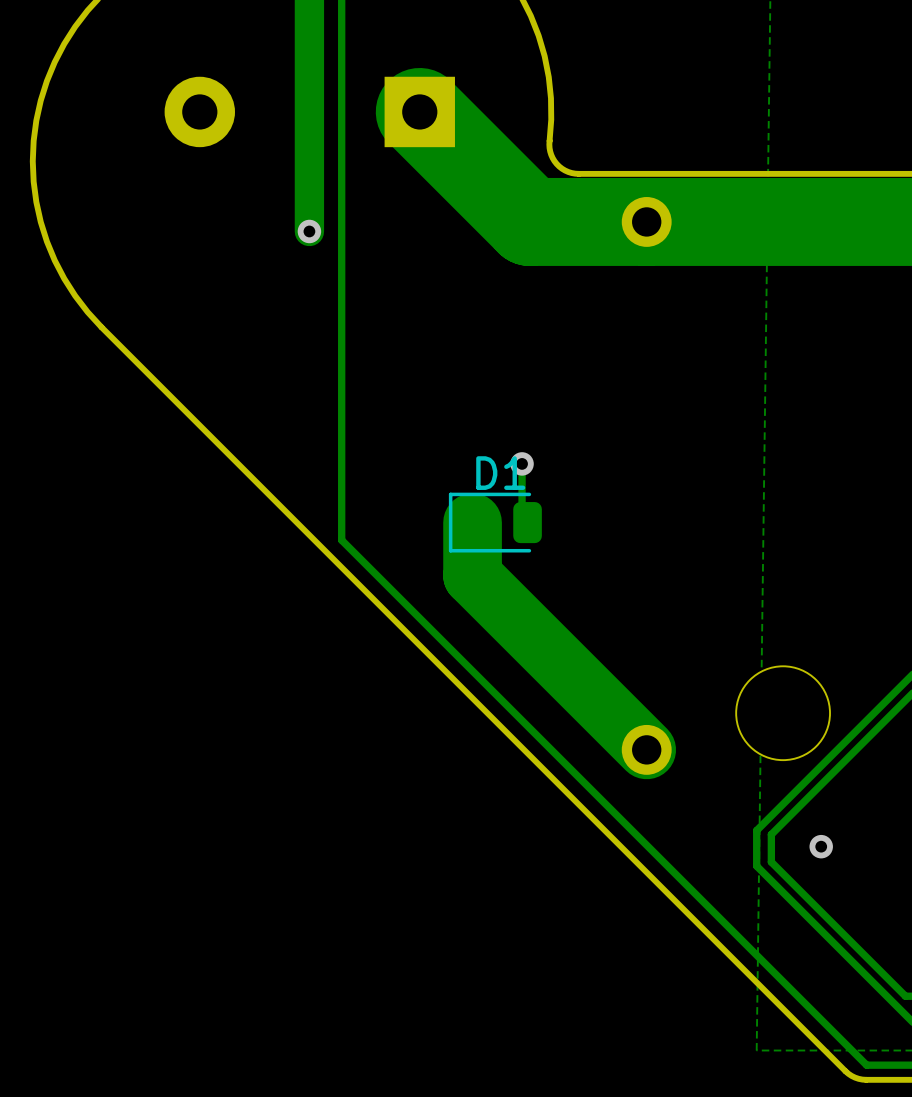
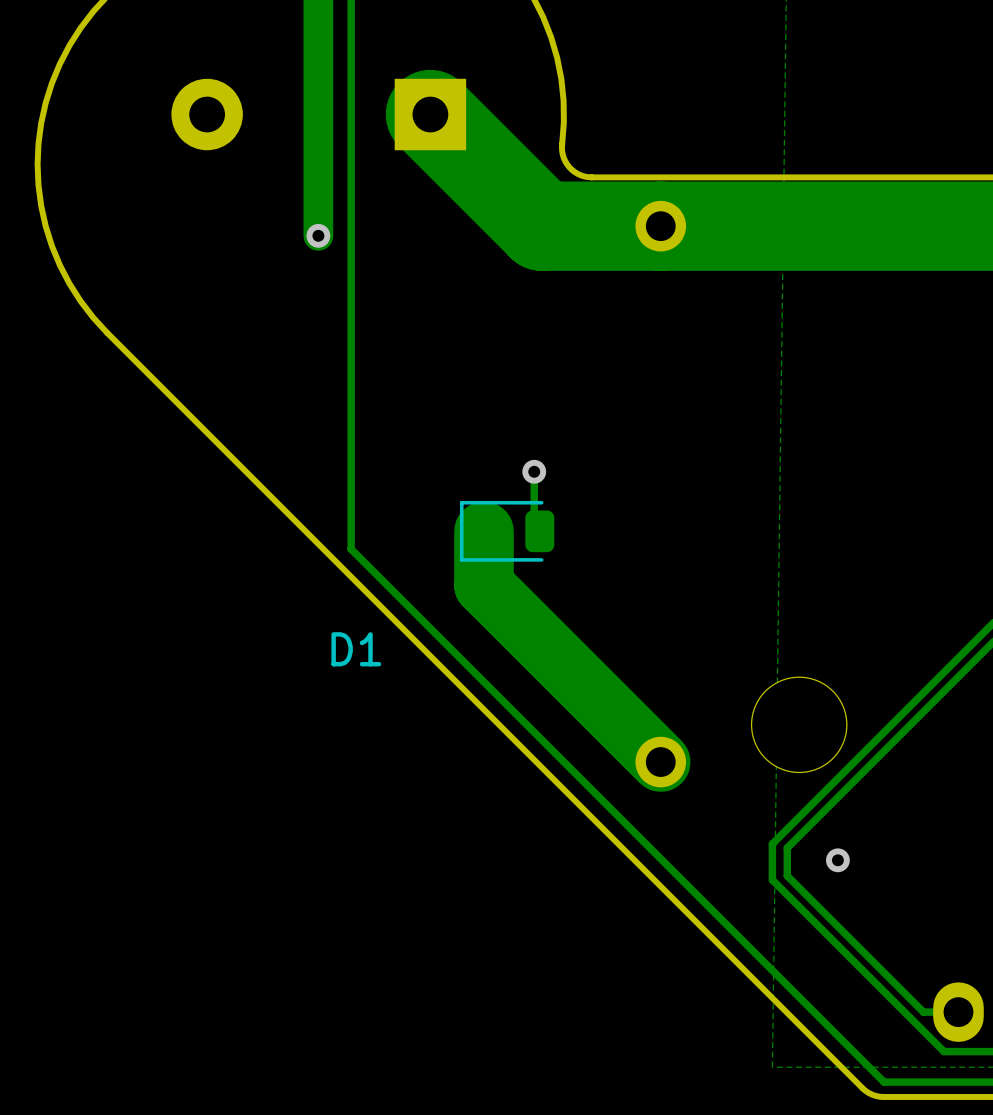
D1 name position: D1 (500, 473) -> D1 (356, 649)

